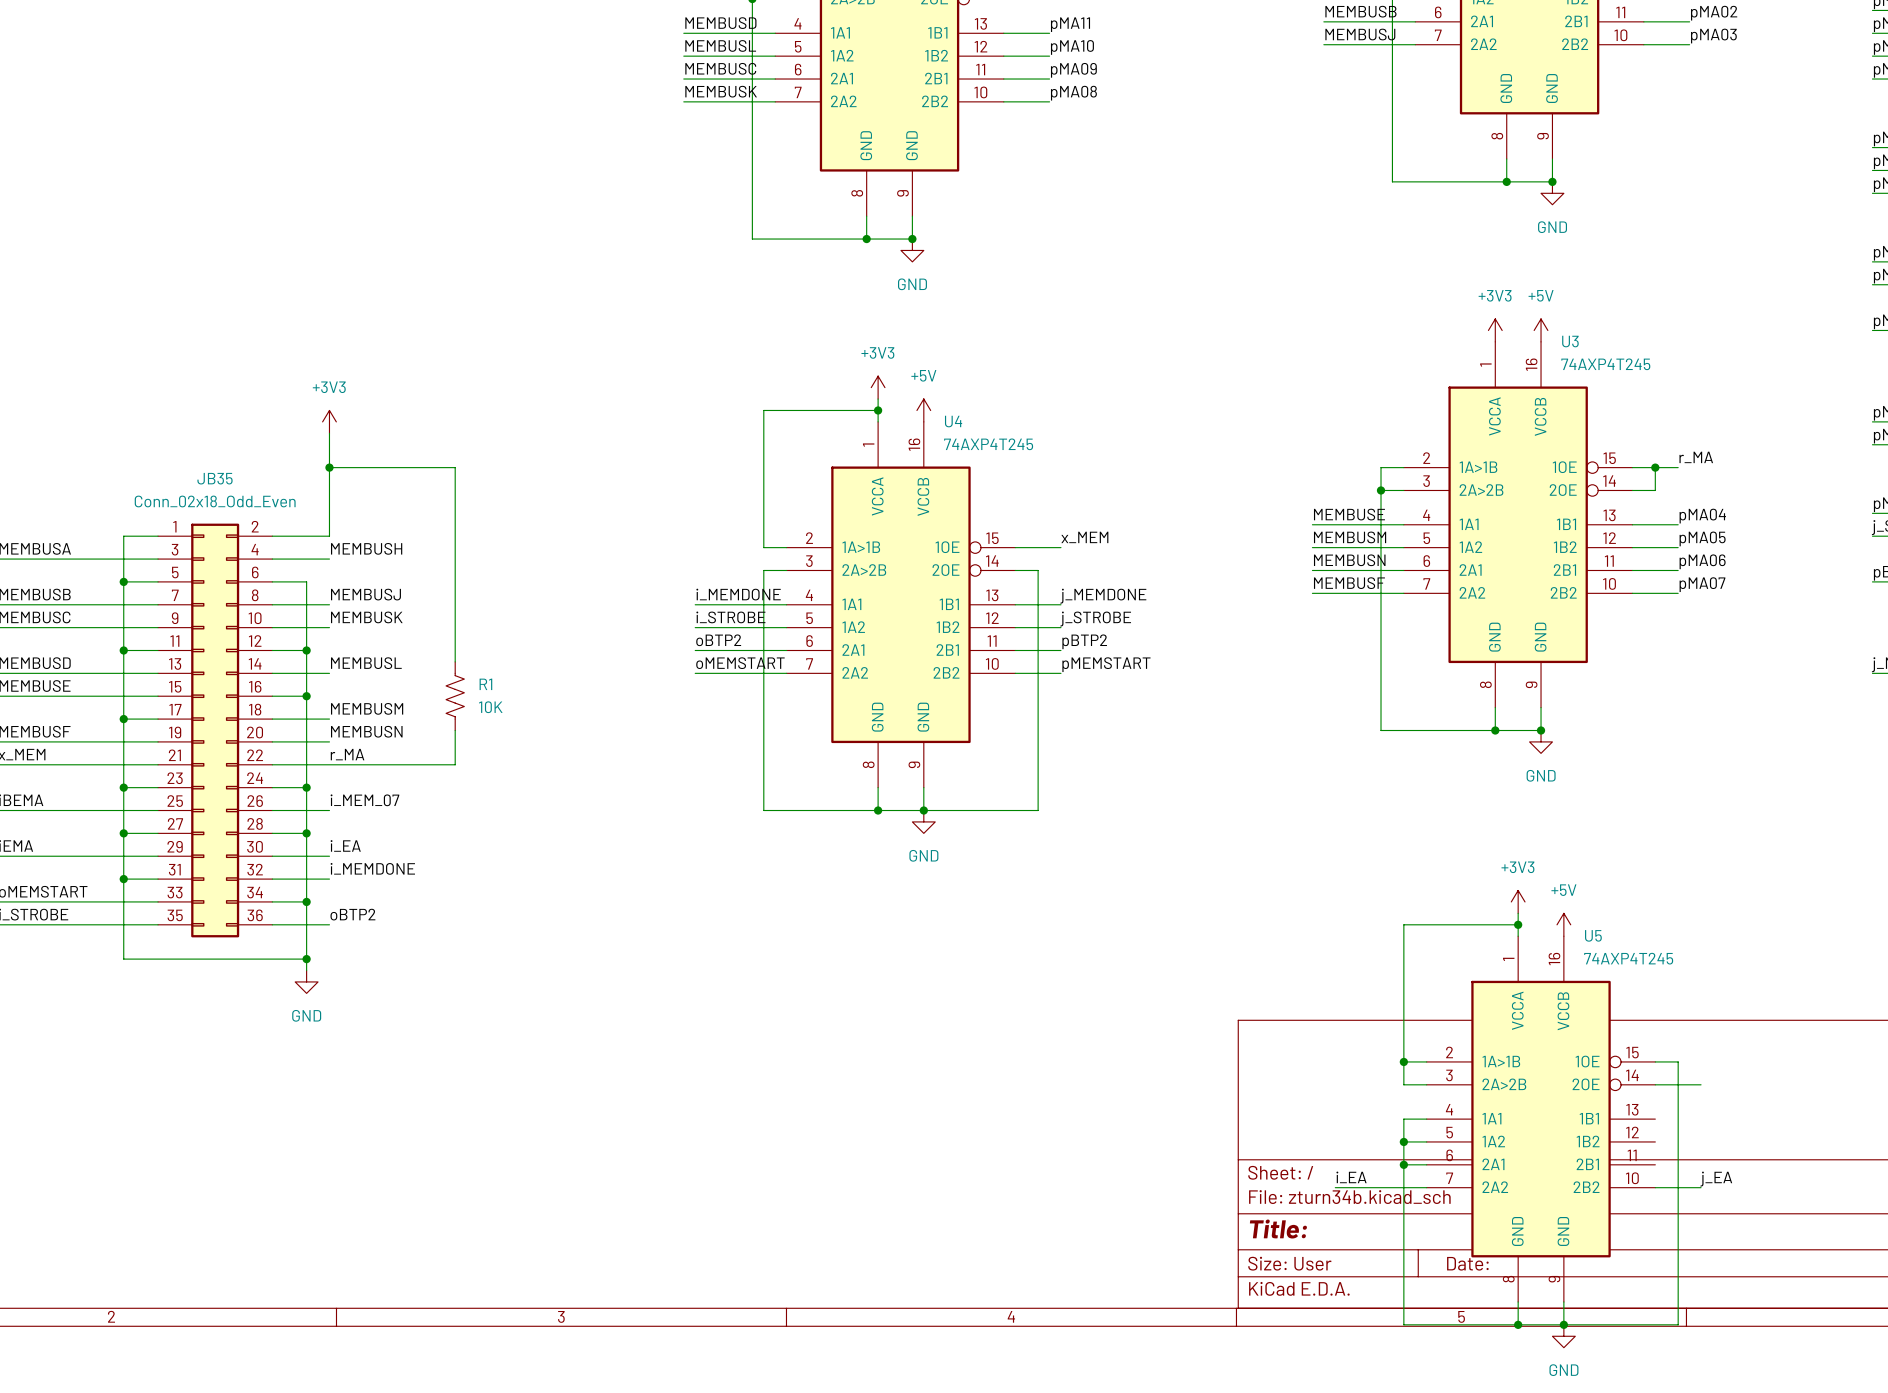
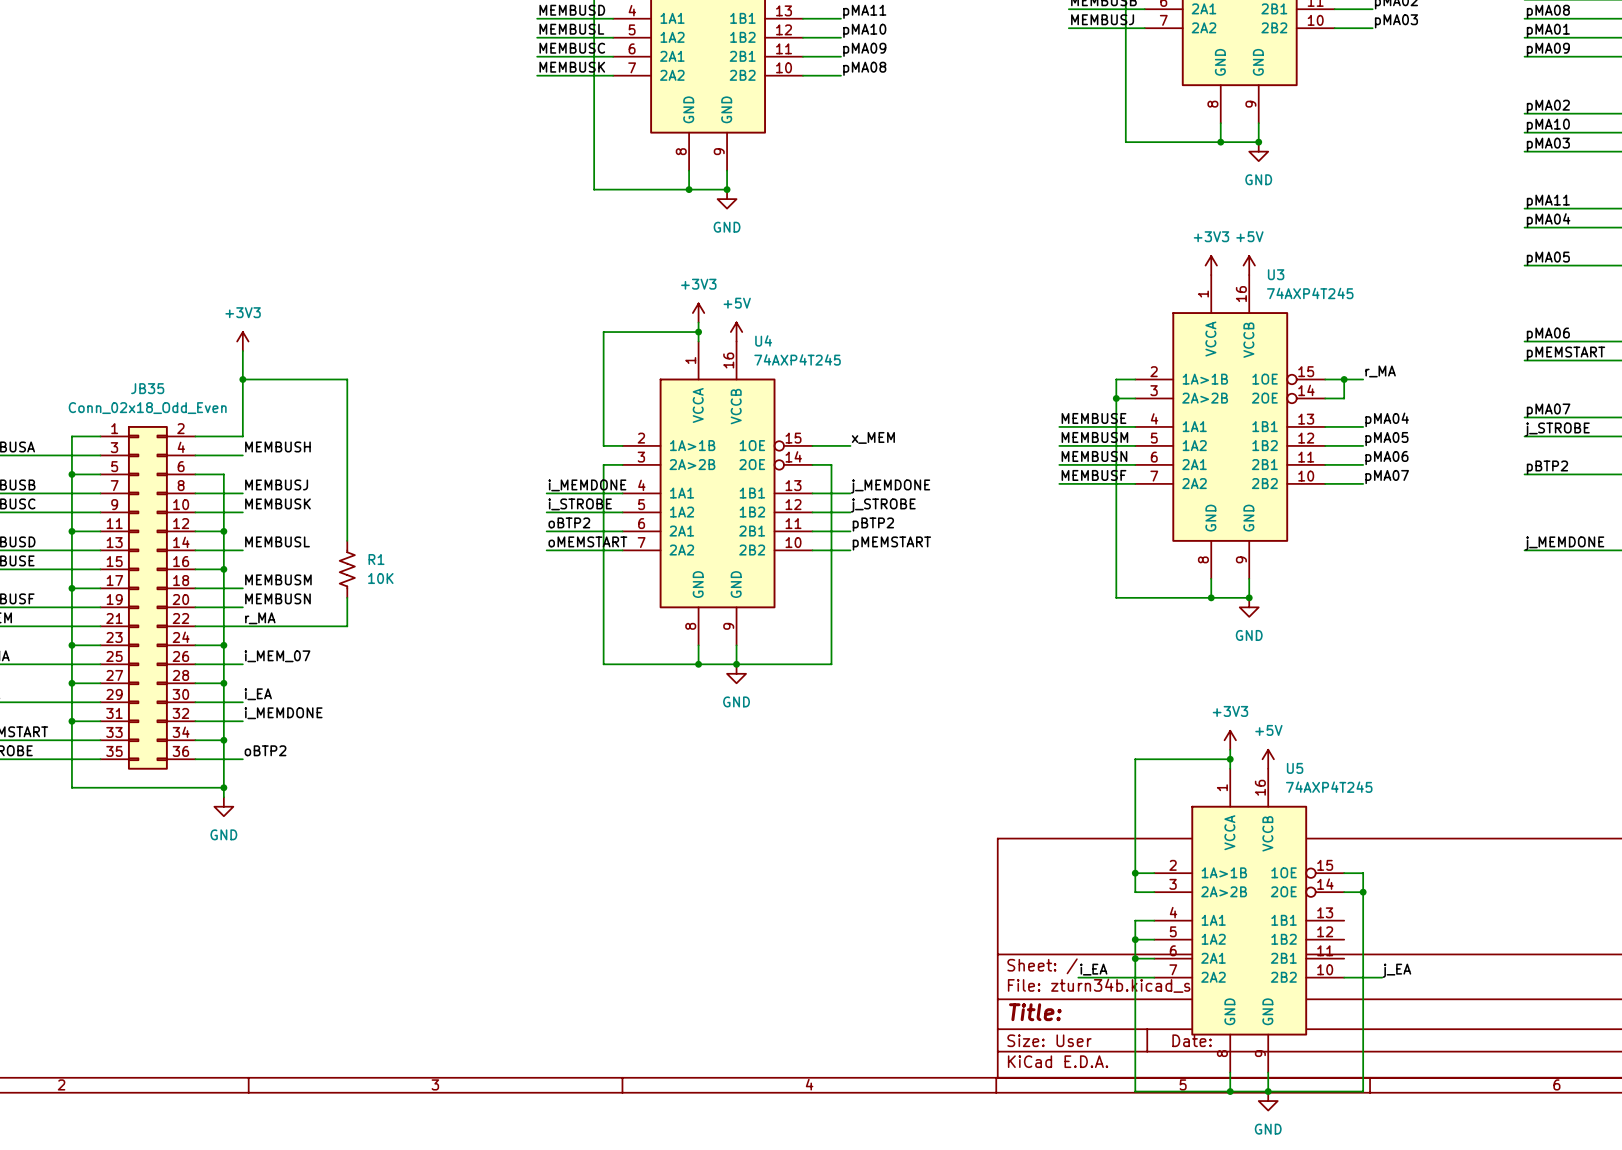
wire: (1678, 1084) (1701, 1084) -> none
junction: none -> (1363, 892)

